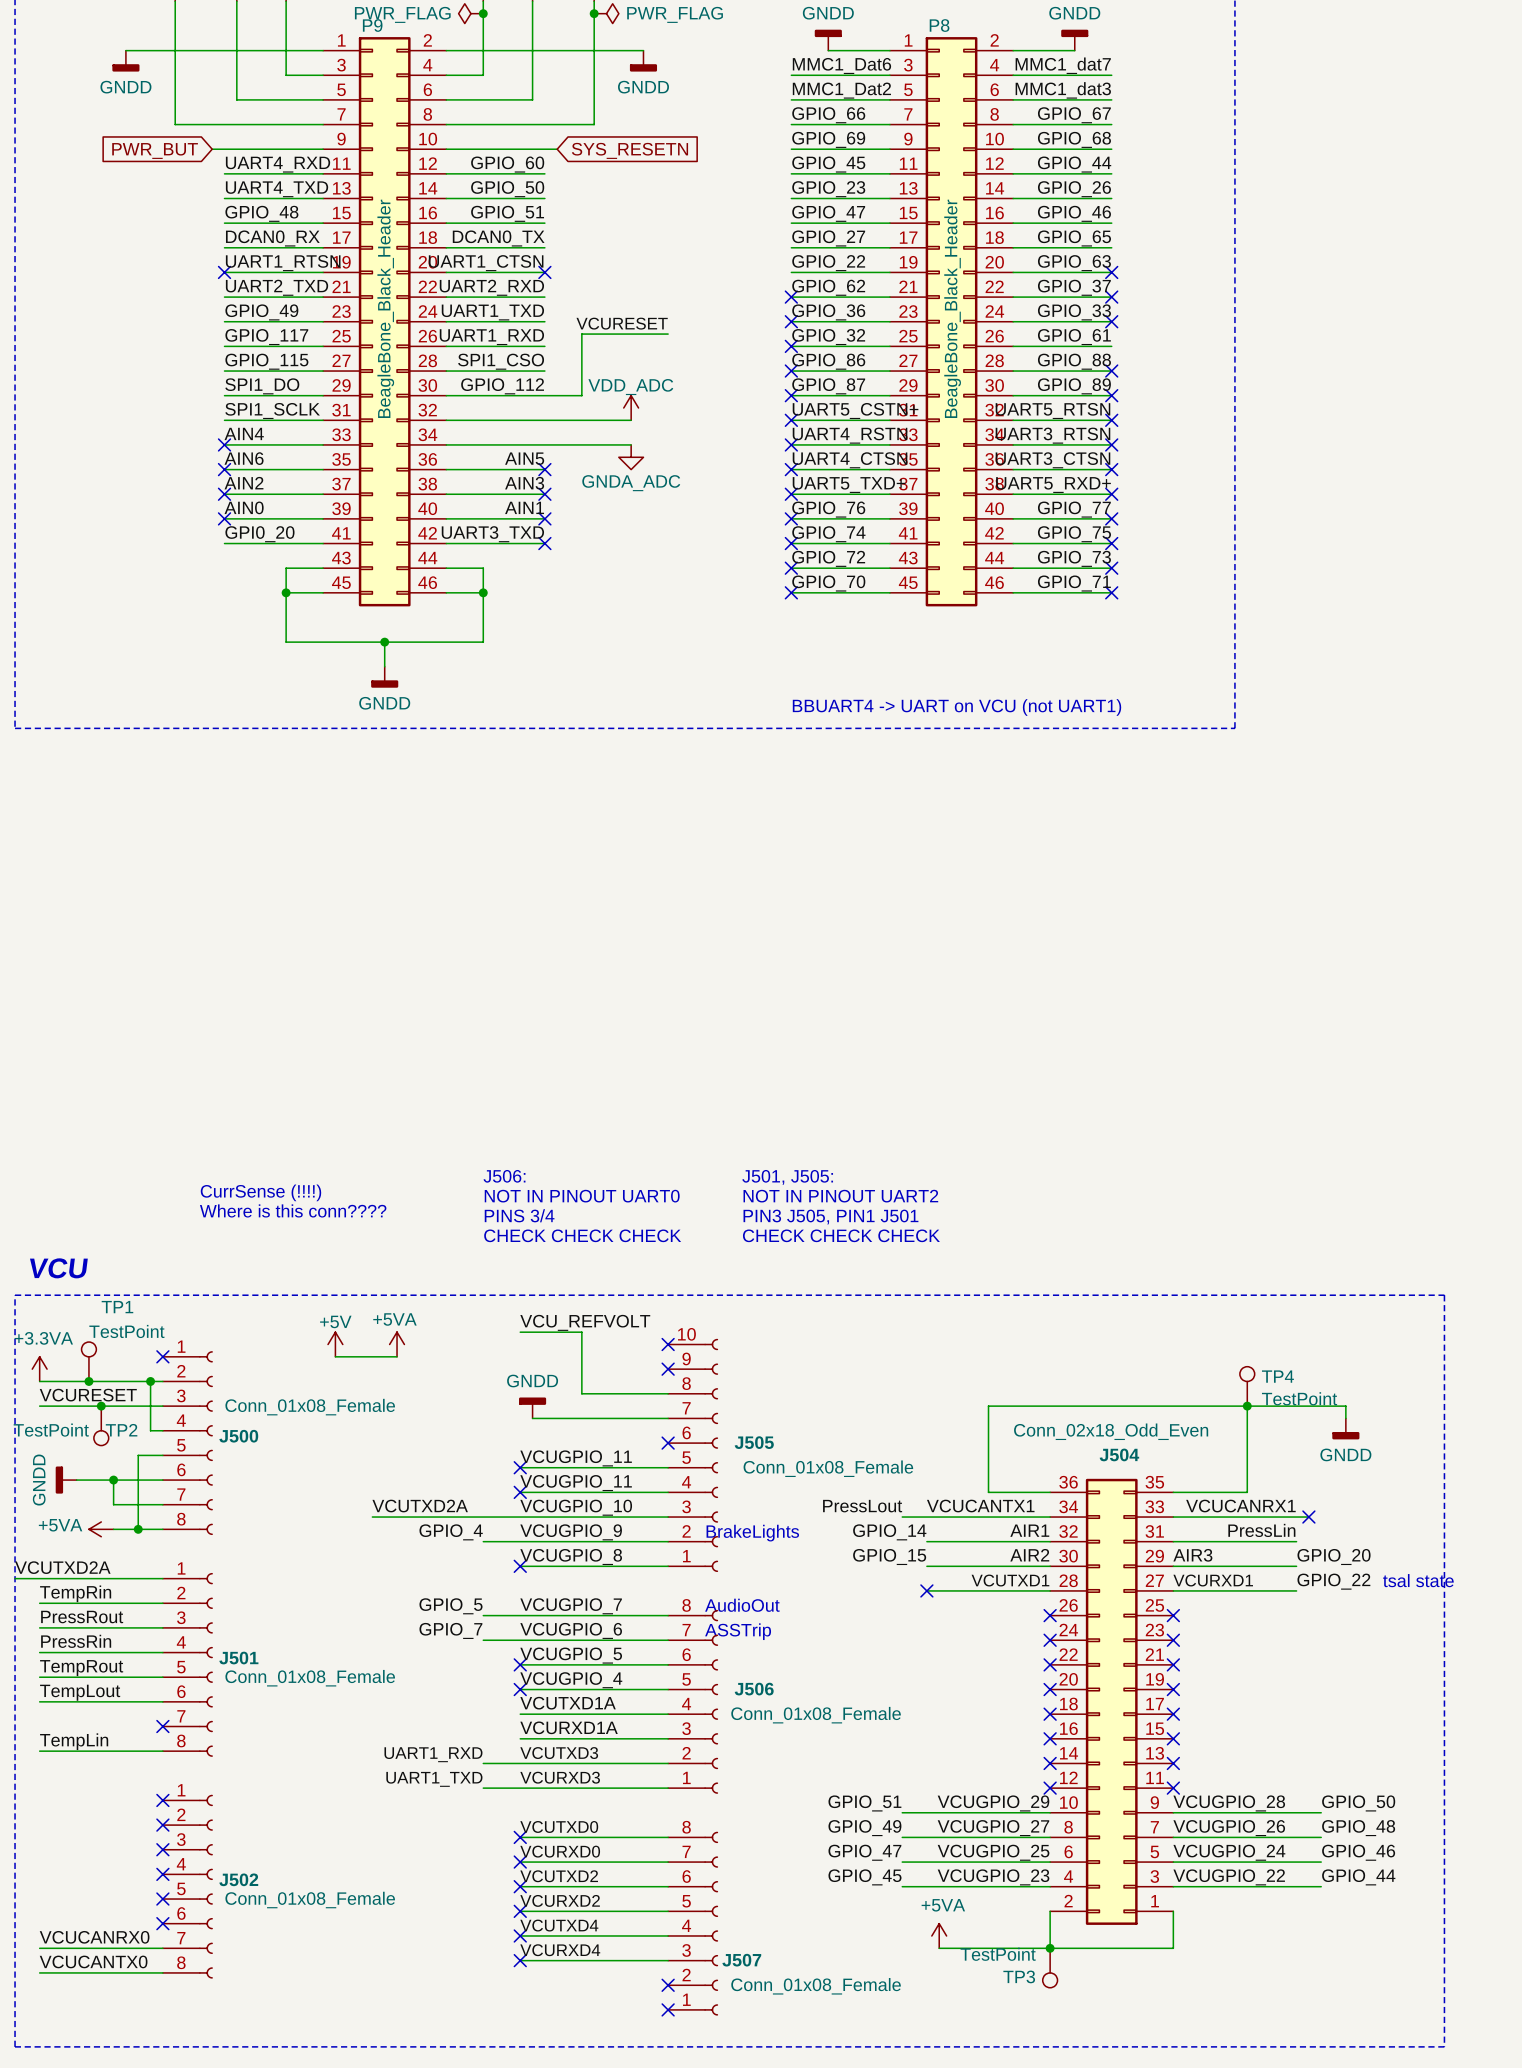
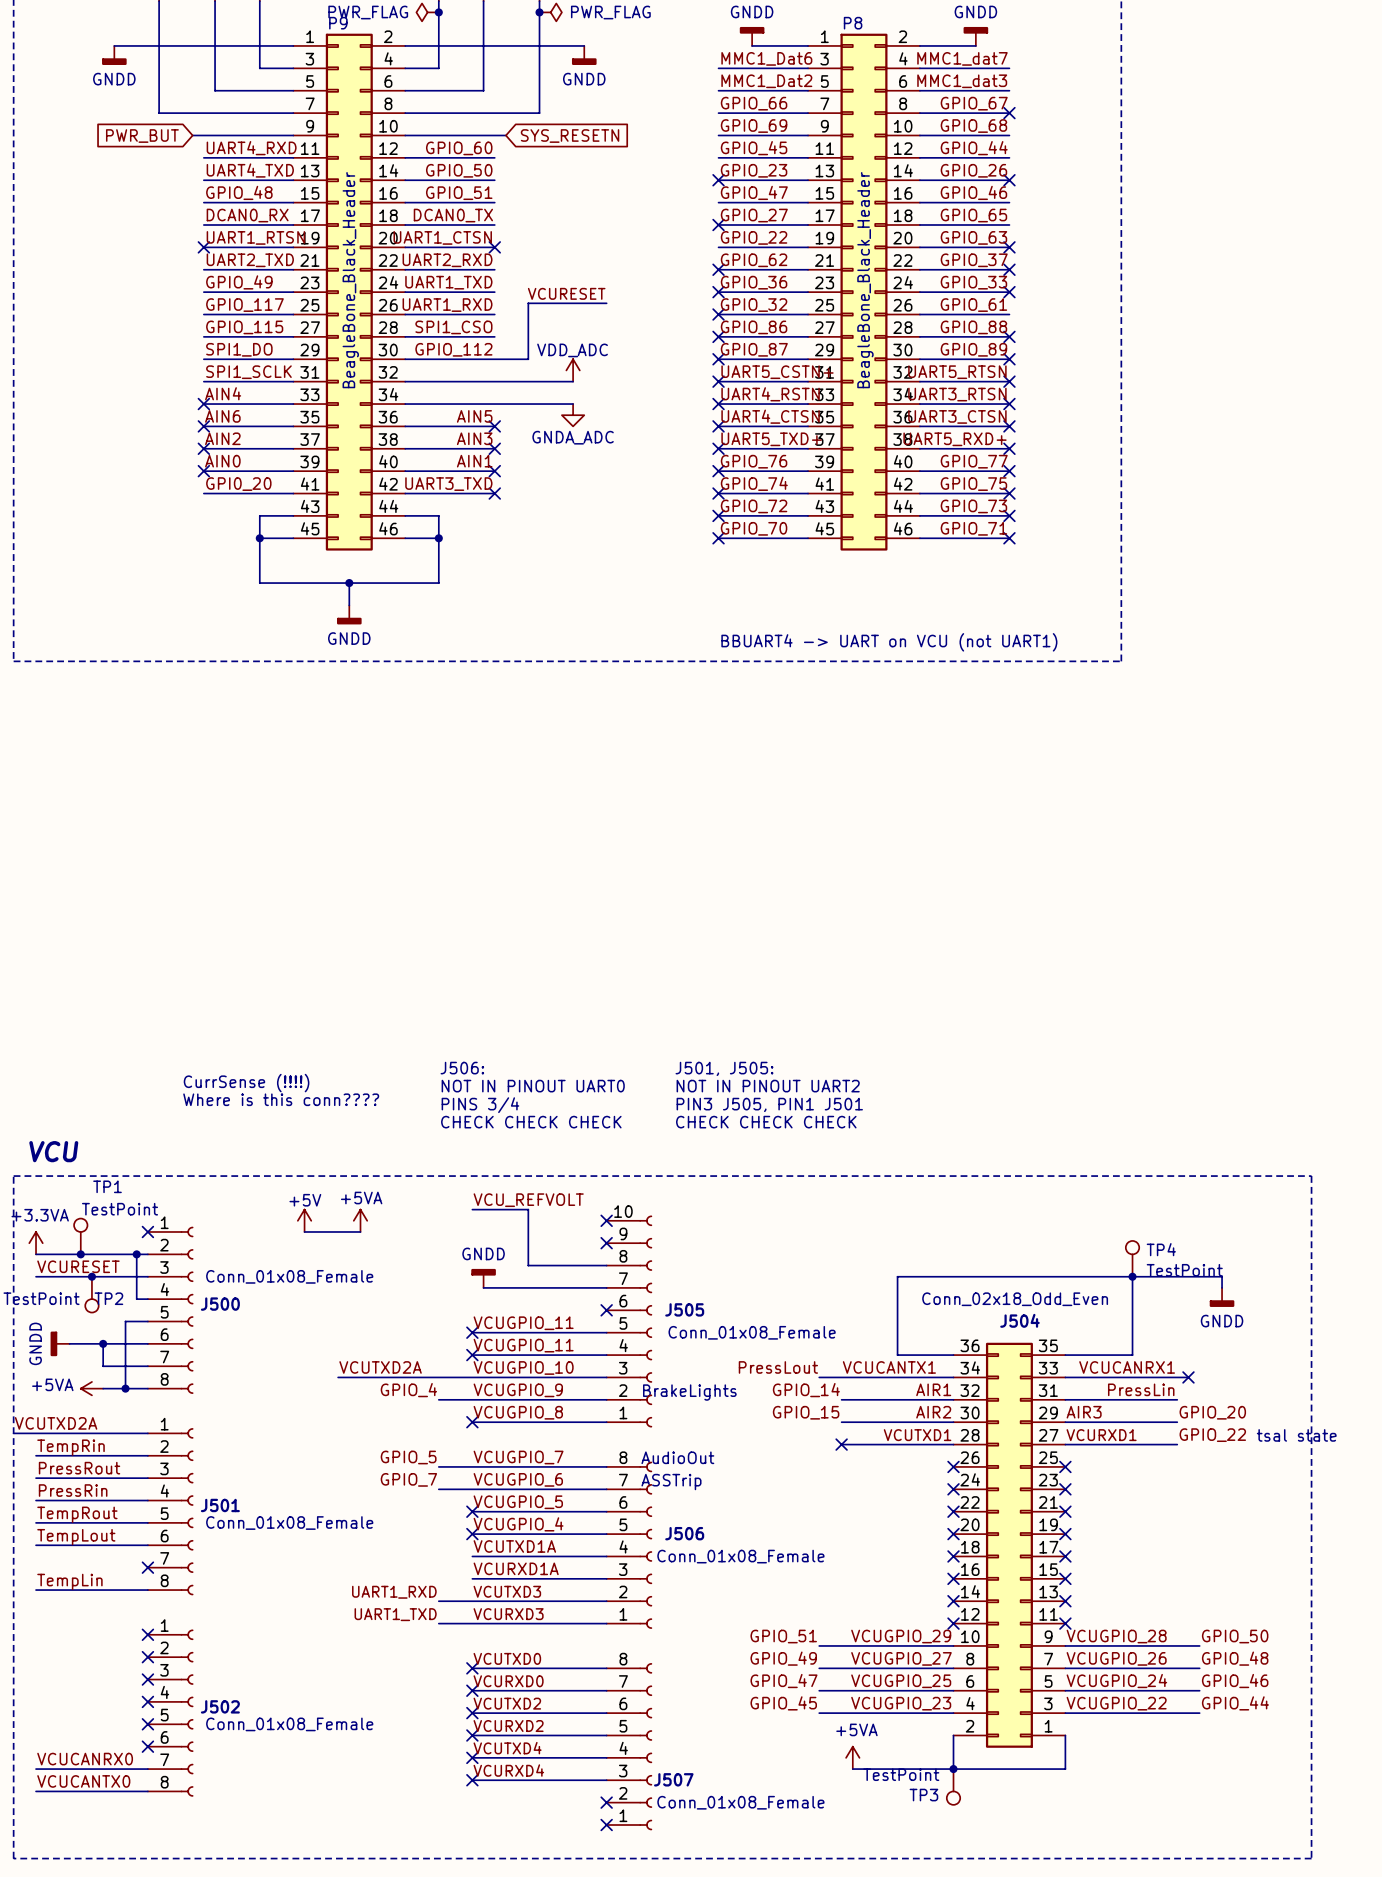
no-connect mark: none -> (1009, 113)
no-connect mark: none -> (718, 180)
no-connect mark: none -> (1009, 180)
no-connect mark: none -> (718, 225)

